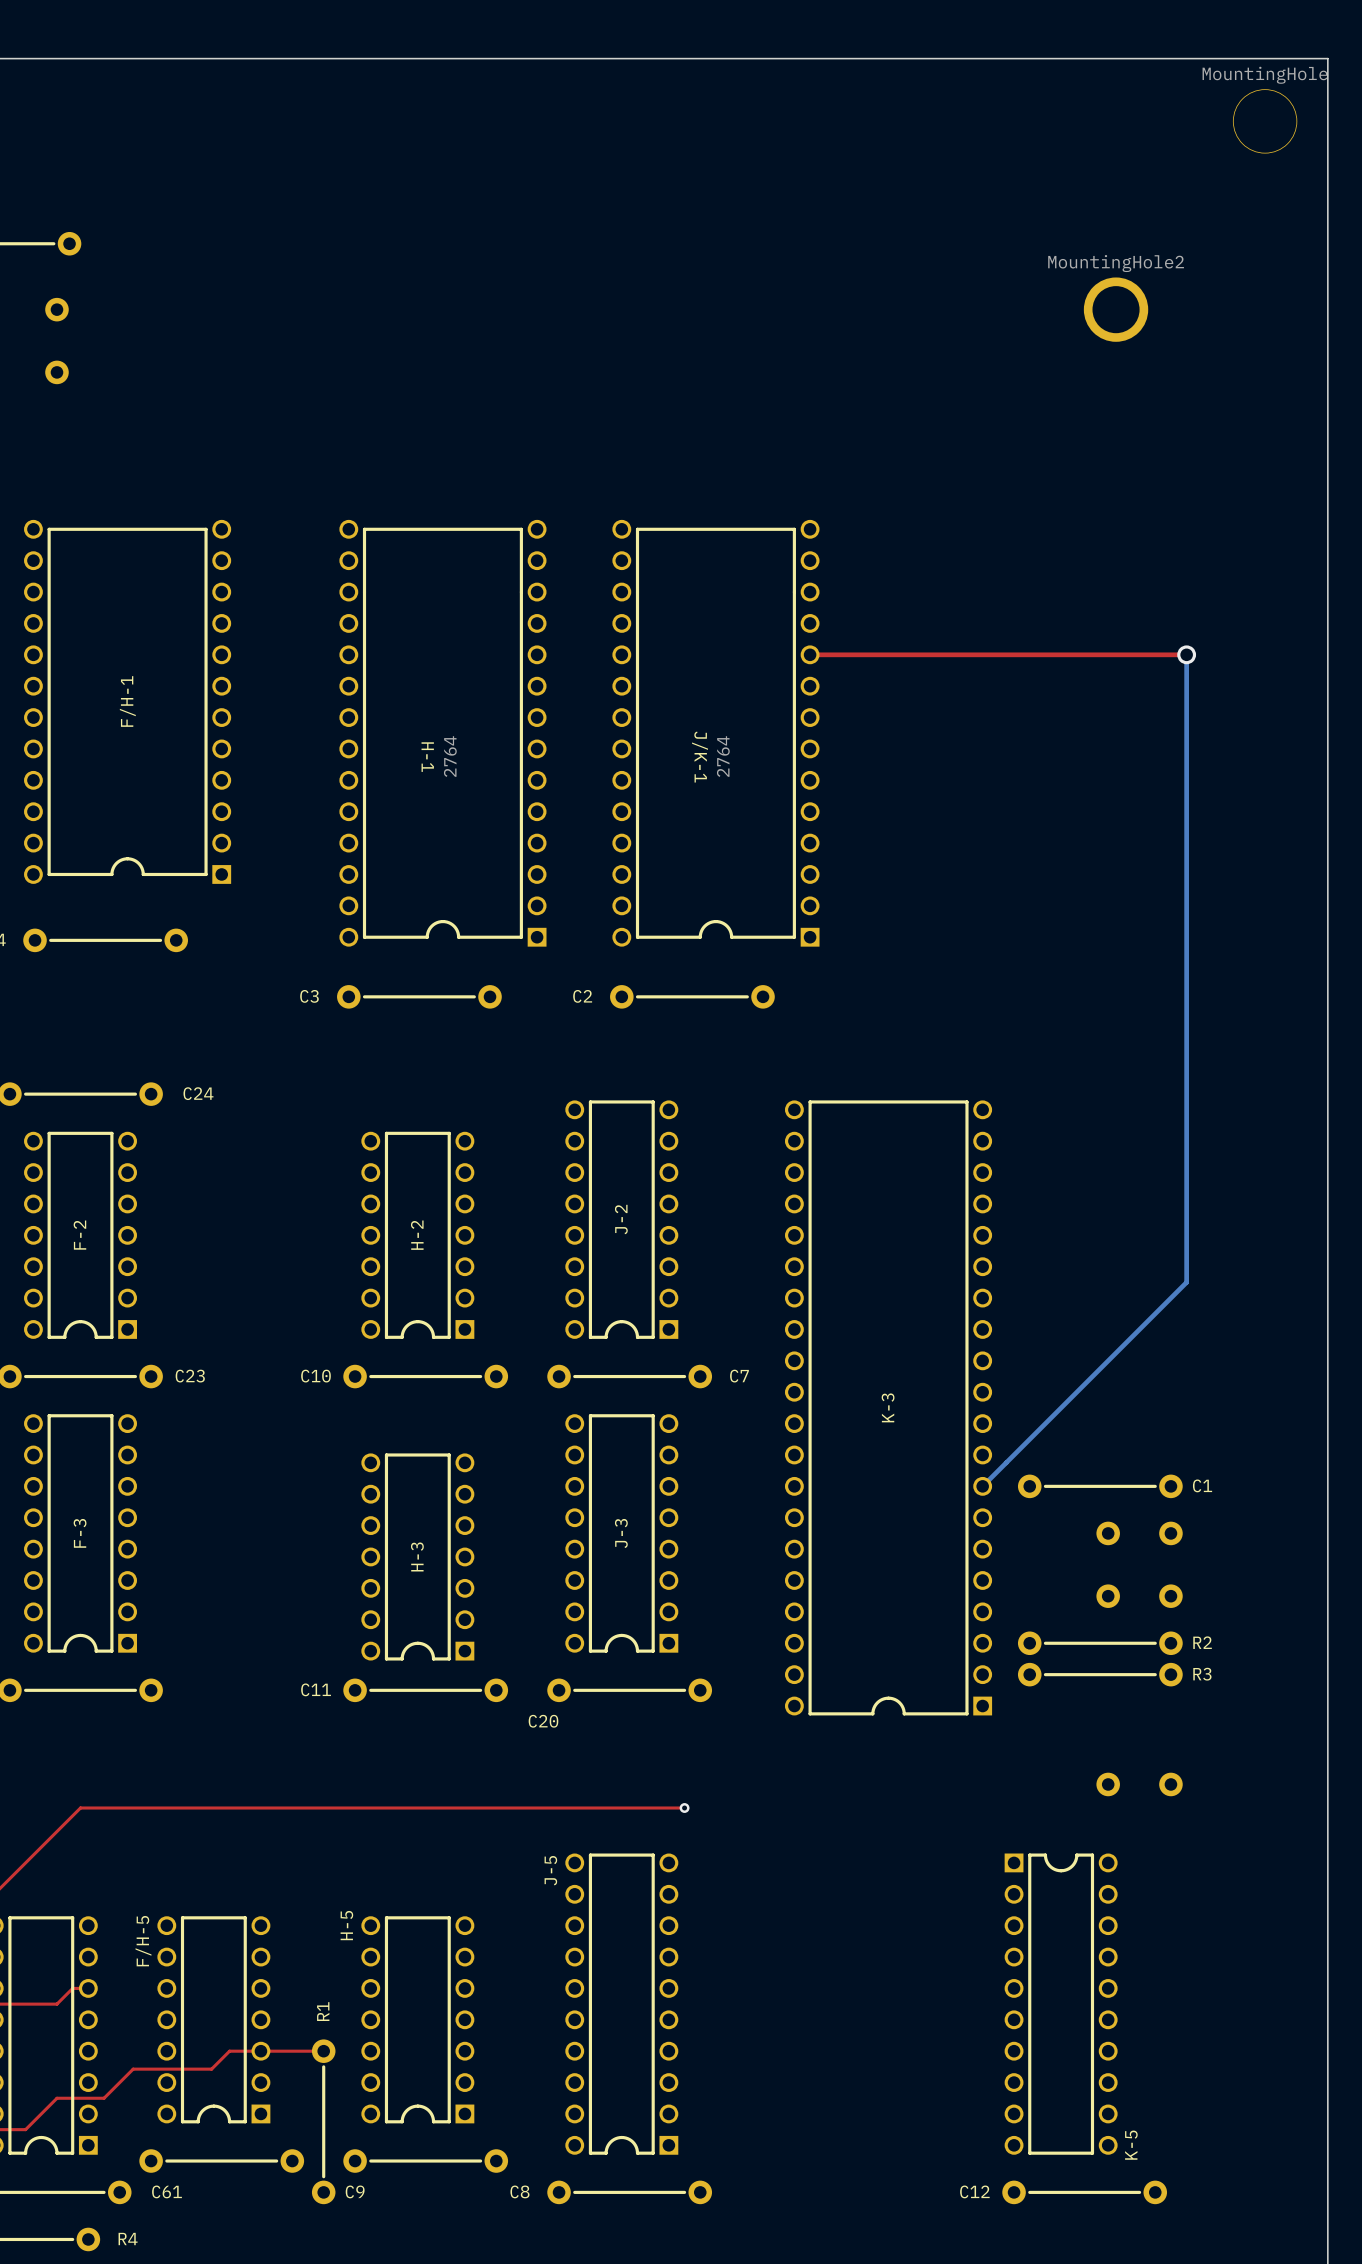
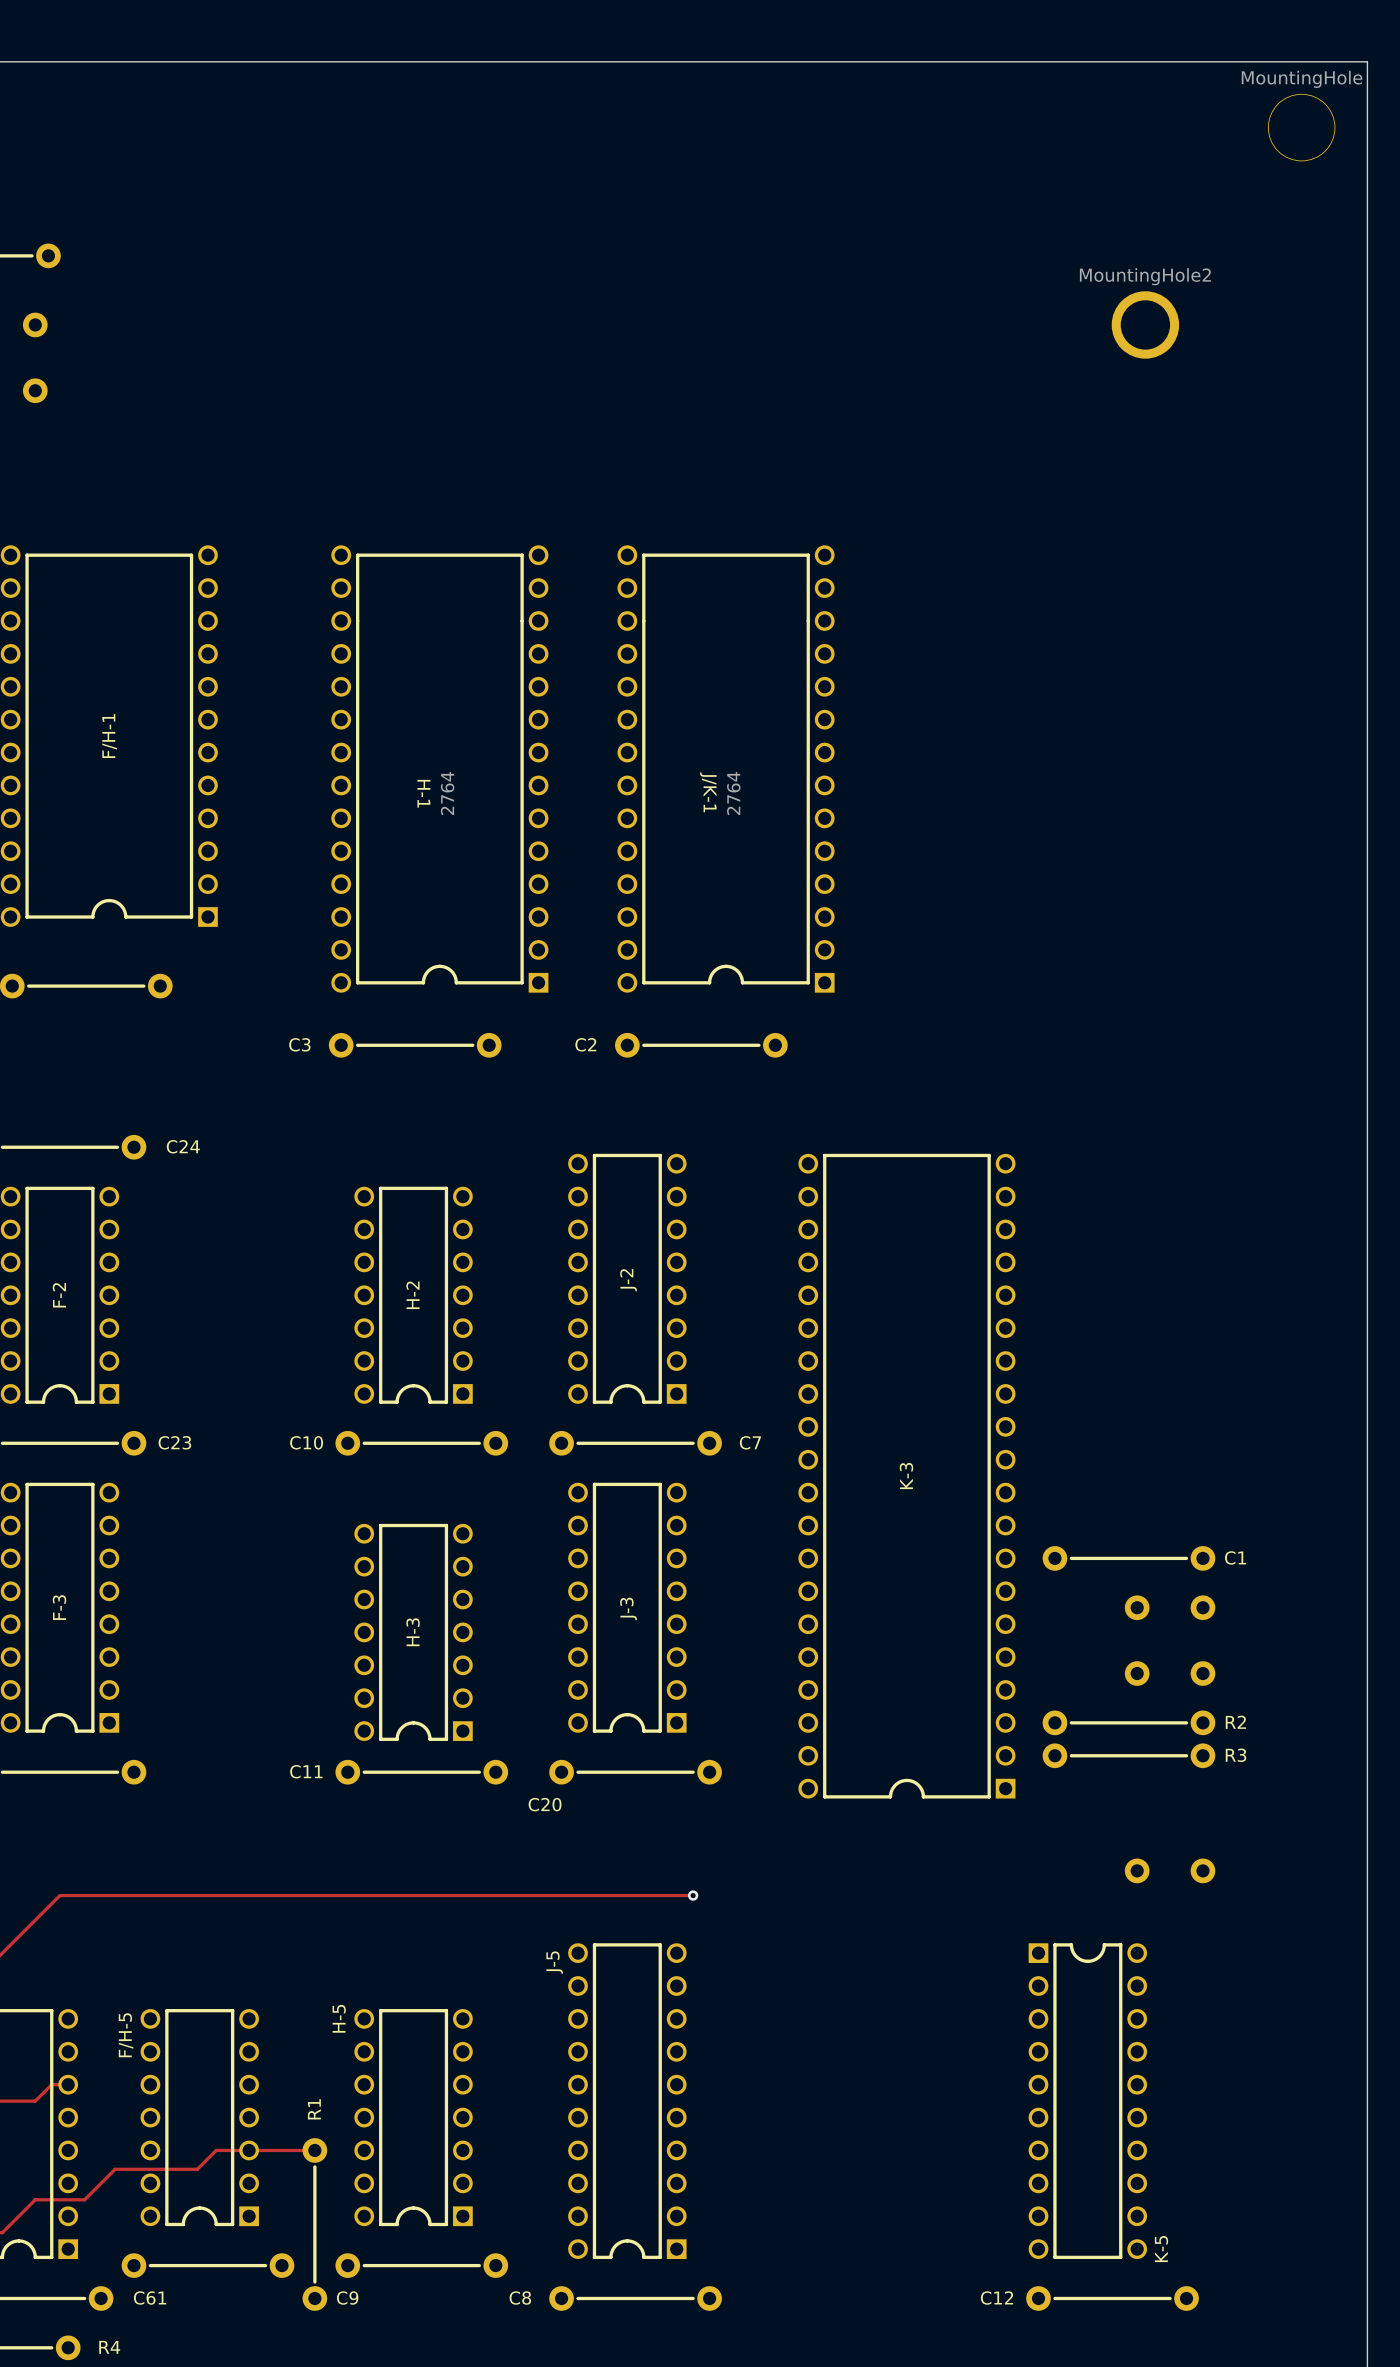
top track: (810, 654) (1186, 654) -> none
bottom track: (1186, 654) (1186, 1282) (982, 1486) -> none
via: (1186, 654) -> none

